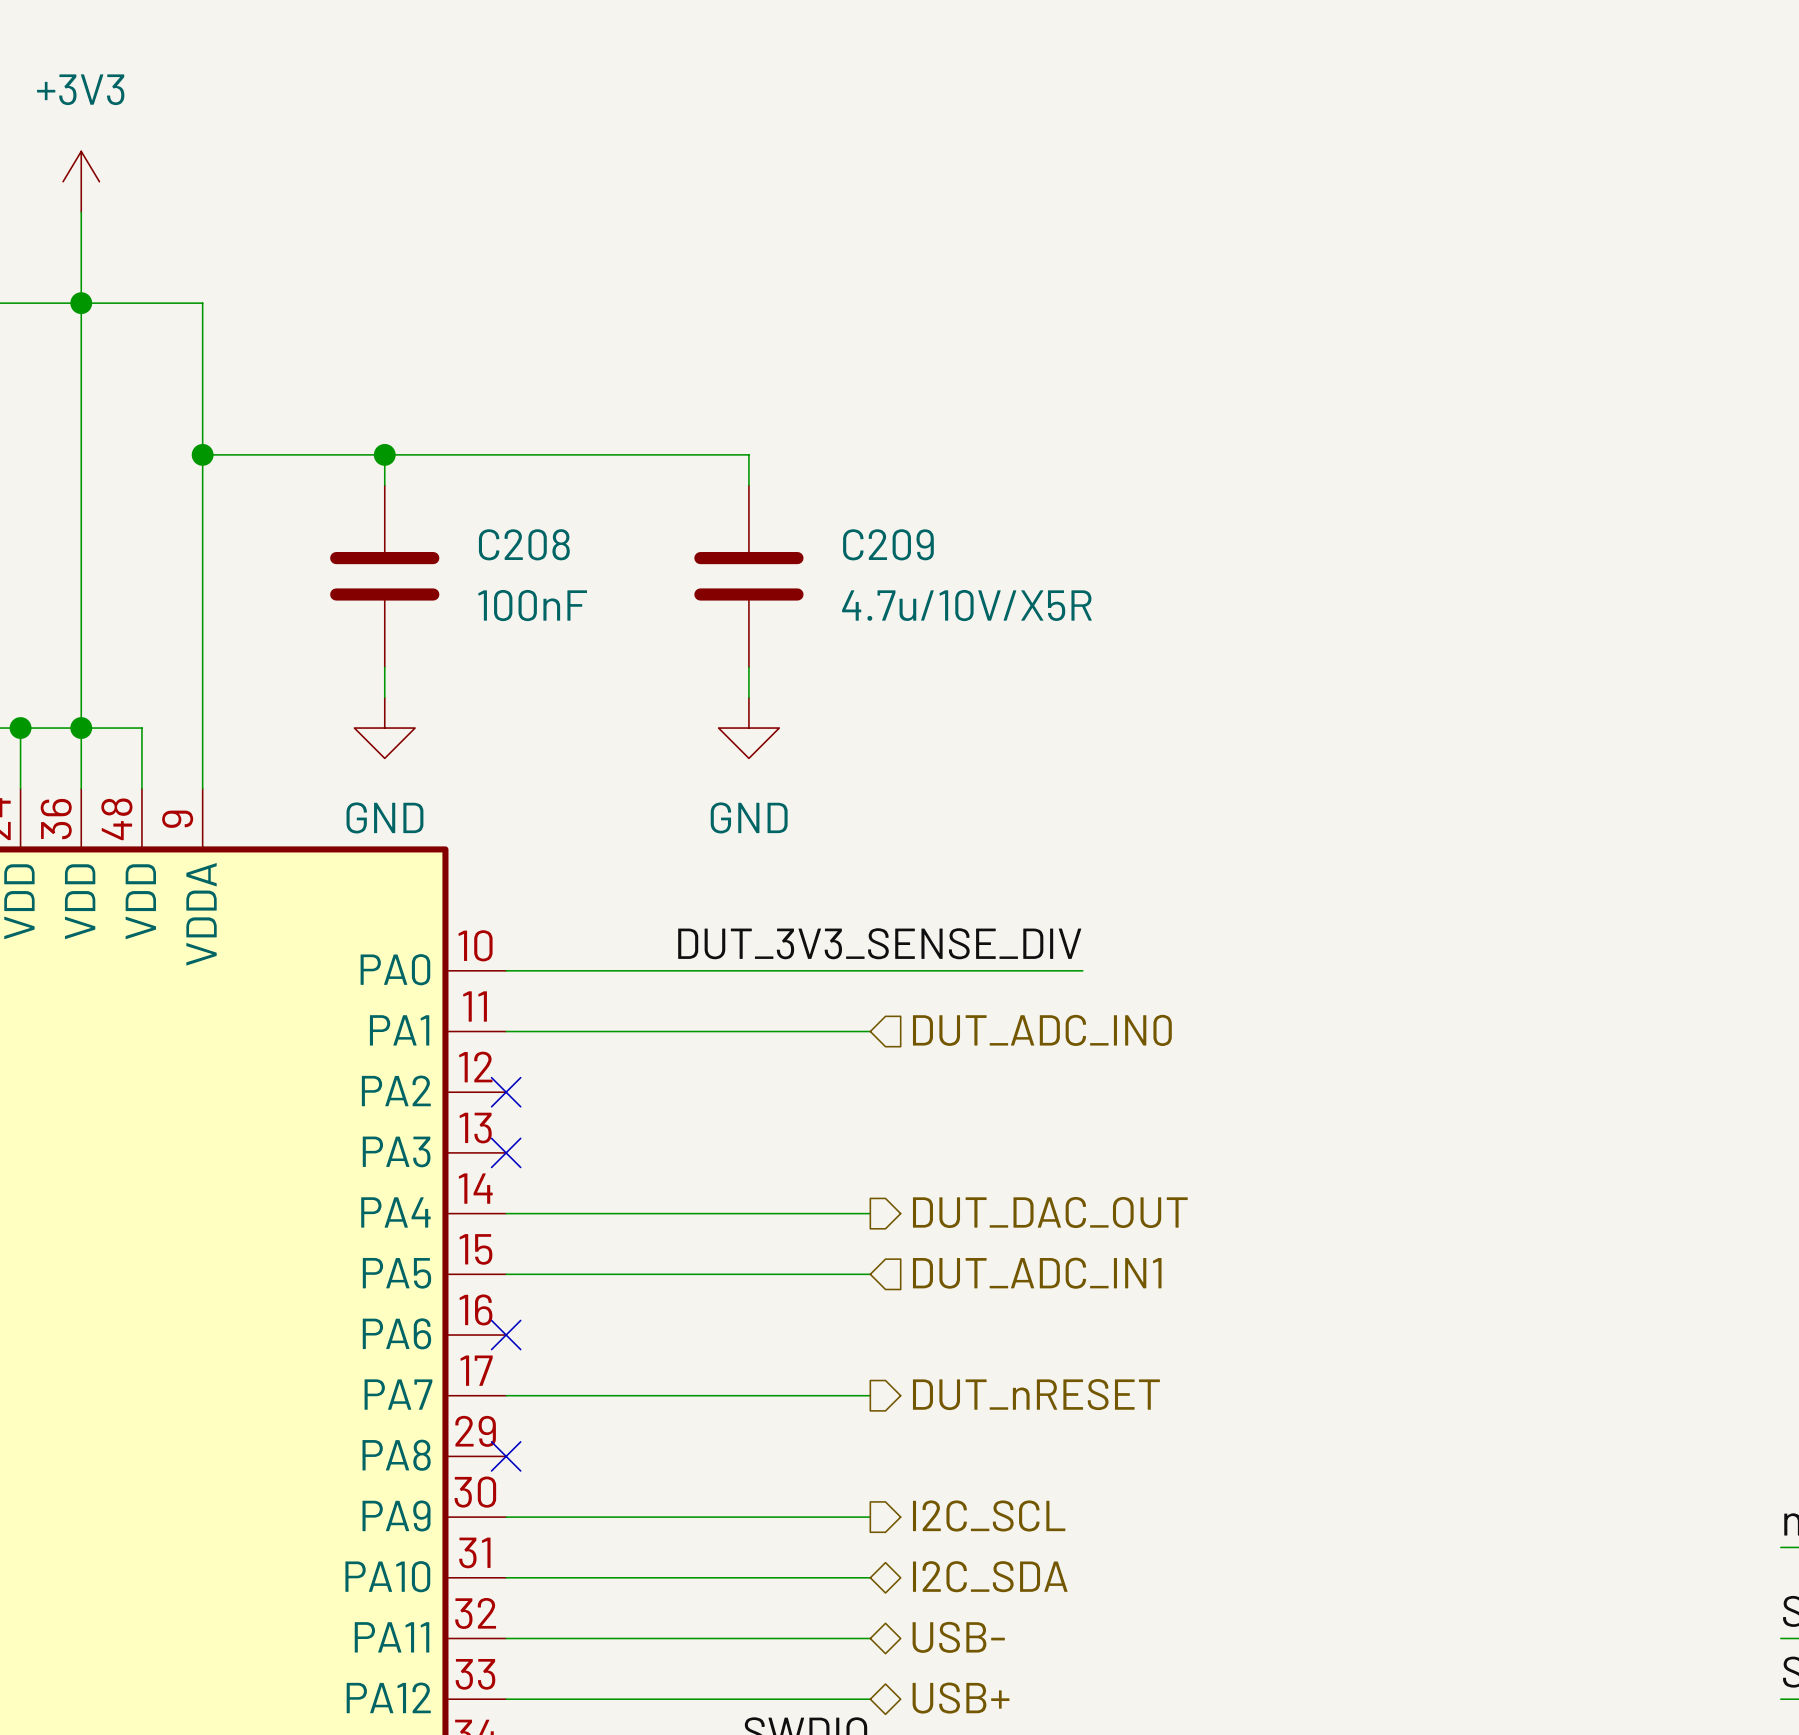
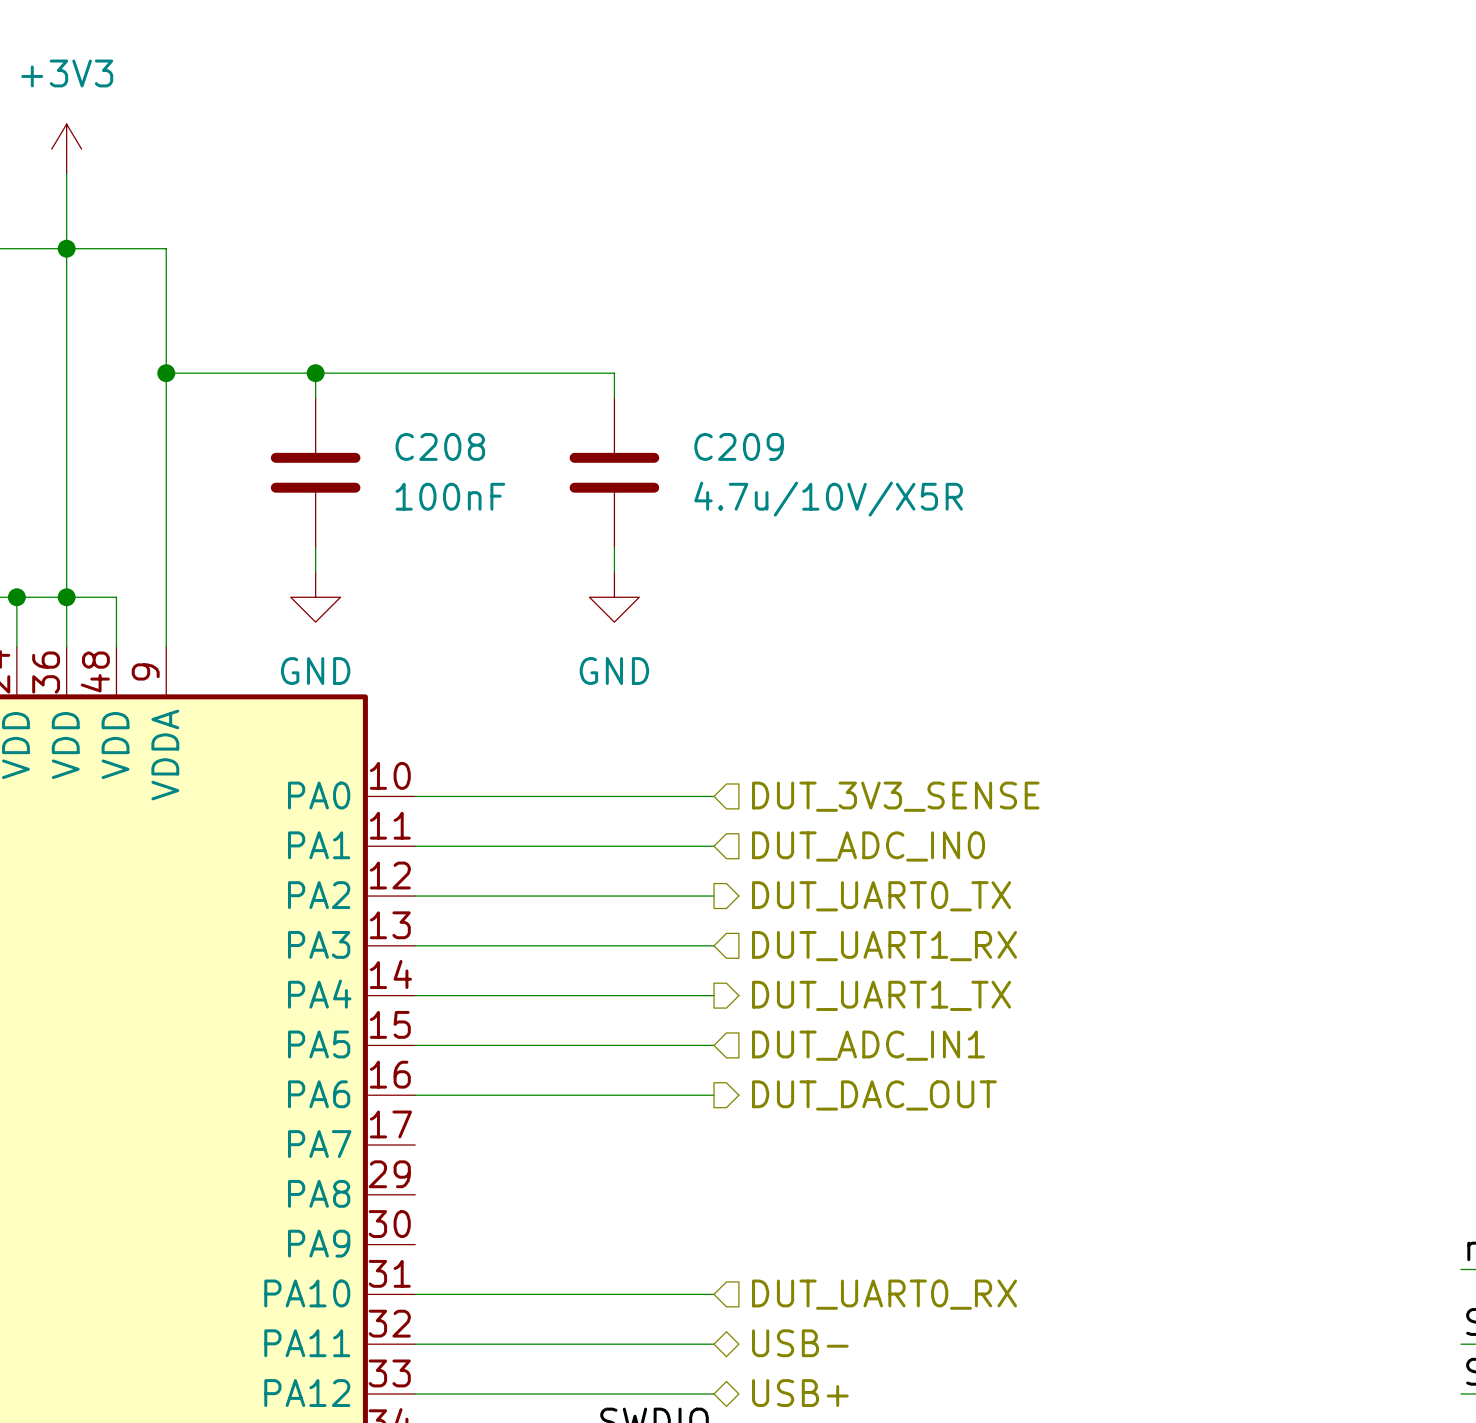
label: DUT_3V3_SENSE_DIV (879, 943) -> none
hierarchical label: none -> DUT_3V3_SENSE (895, 796)
wire: (870, 970) (1082, 970) -> none
hierarchical label: none -> DUT_UART0_TX (881, 896)
wire: none -> (415, 896) (714, 896)
no-connect mark: (506, 1092) -> none
hierarchical label: none -> DUT_UART1_RX (884, 946)
no-connect mark: (506, 1152) -> none
hierarchical label: DUT_DAC_OUT (1050, 1212) -> DUT_UART1_TX (881, 995)
hierarchical label: none -> DUT_DAC_OUT (874, 1095)
no-connect mark: (506, 1335) -> none
hierarchical label: DUT_nRESET (1036, 1394) -> none
wire: (506, 1395) (870, 1395) -> (415, 1095) (714, 1095)
no-connect mark: (506, 1456) -> none
hierarchical label: I2C_SCL (989, 1515) -> none
wire: (506, 1517) (870, 1517) -> (415, 945) (714, 945)
hierarchical label shape: bidirectional (990, 1576) -> input (884, 1294)
hierarchical label: I2C_SDA (990, 1576) -> DUT_UART0_RX (884, 1294)

